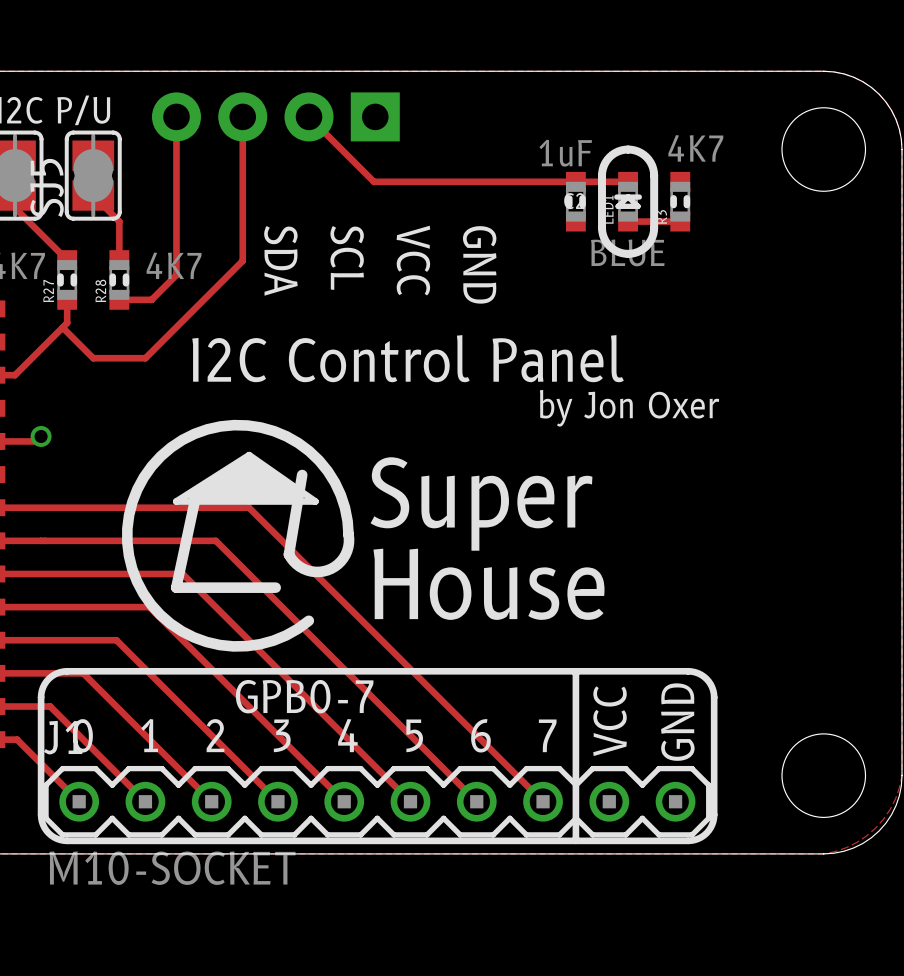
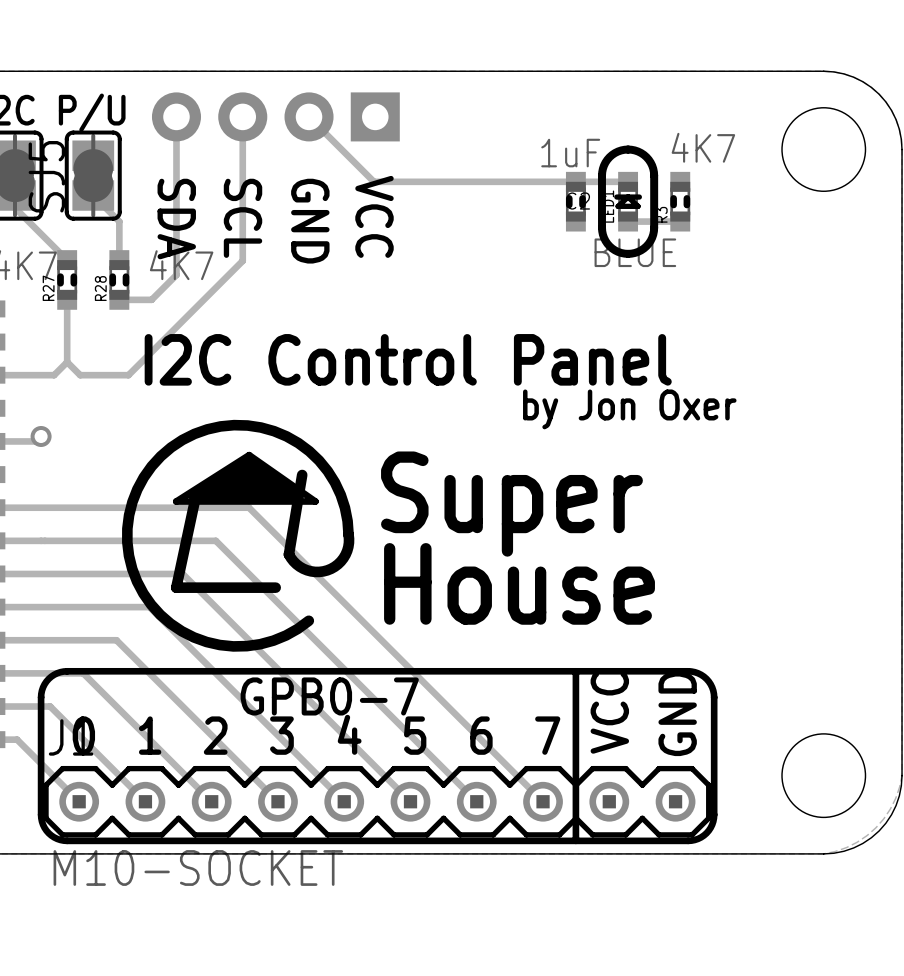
text position: SCL (347, 257) -> SCL (243, 218)
text position: SDA (280, 260) -> SDA (176, 219)
text position: VCC (413, 260) -> VCC (374, 216)
text position: GND (479, 264) -> GND (310, 221)
track: (67, 323) (15, 375) -> (67, 362) (54, 375) (15, 375)
track: none -> (67, 323) (67, 362)
track: (62, 327) (93, 358) (145, 358) -> (67, 362) (80, 375) (128, 375) (145, 358)

